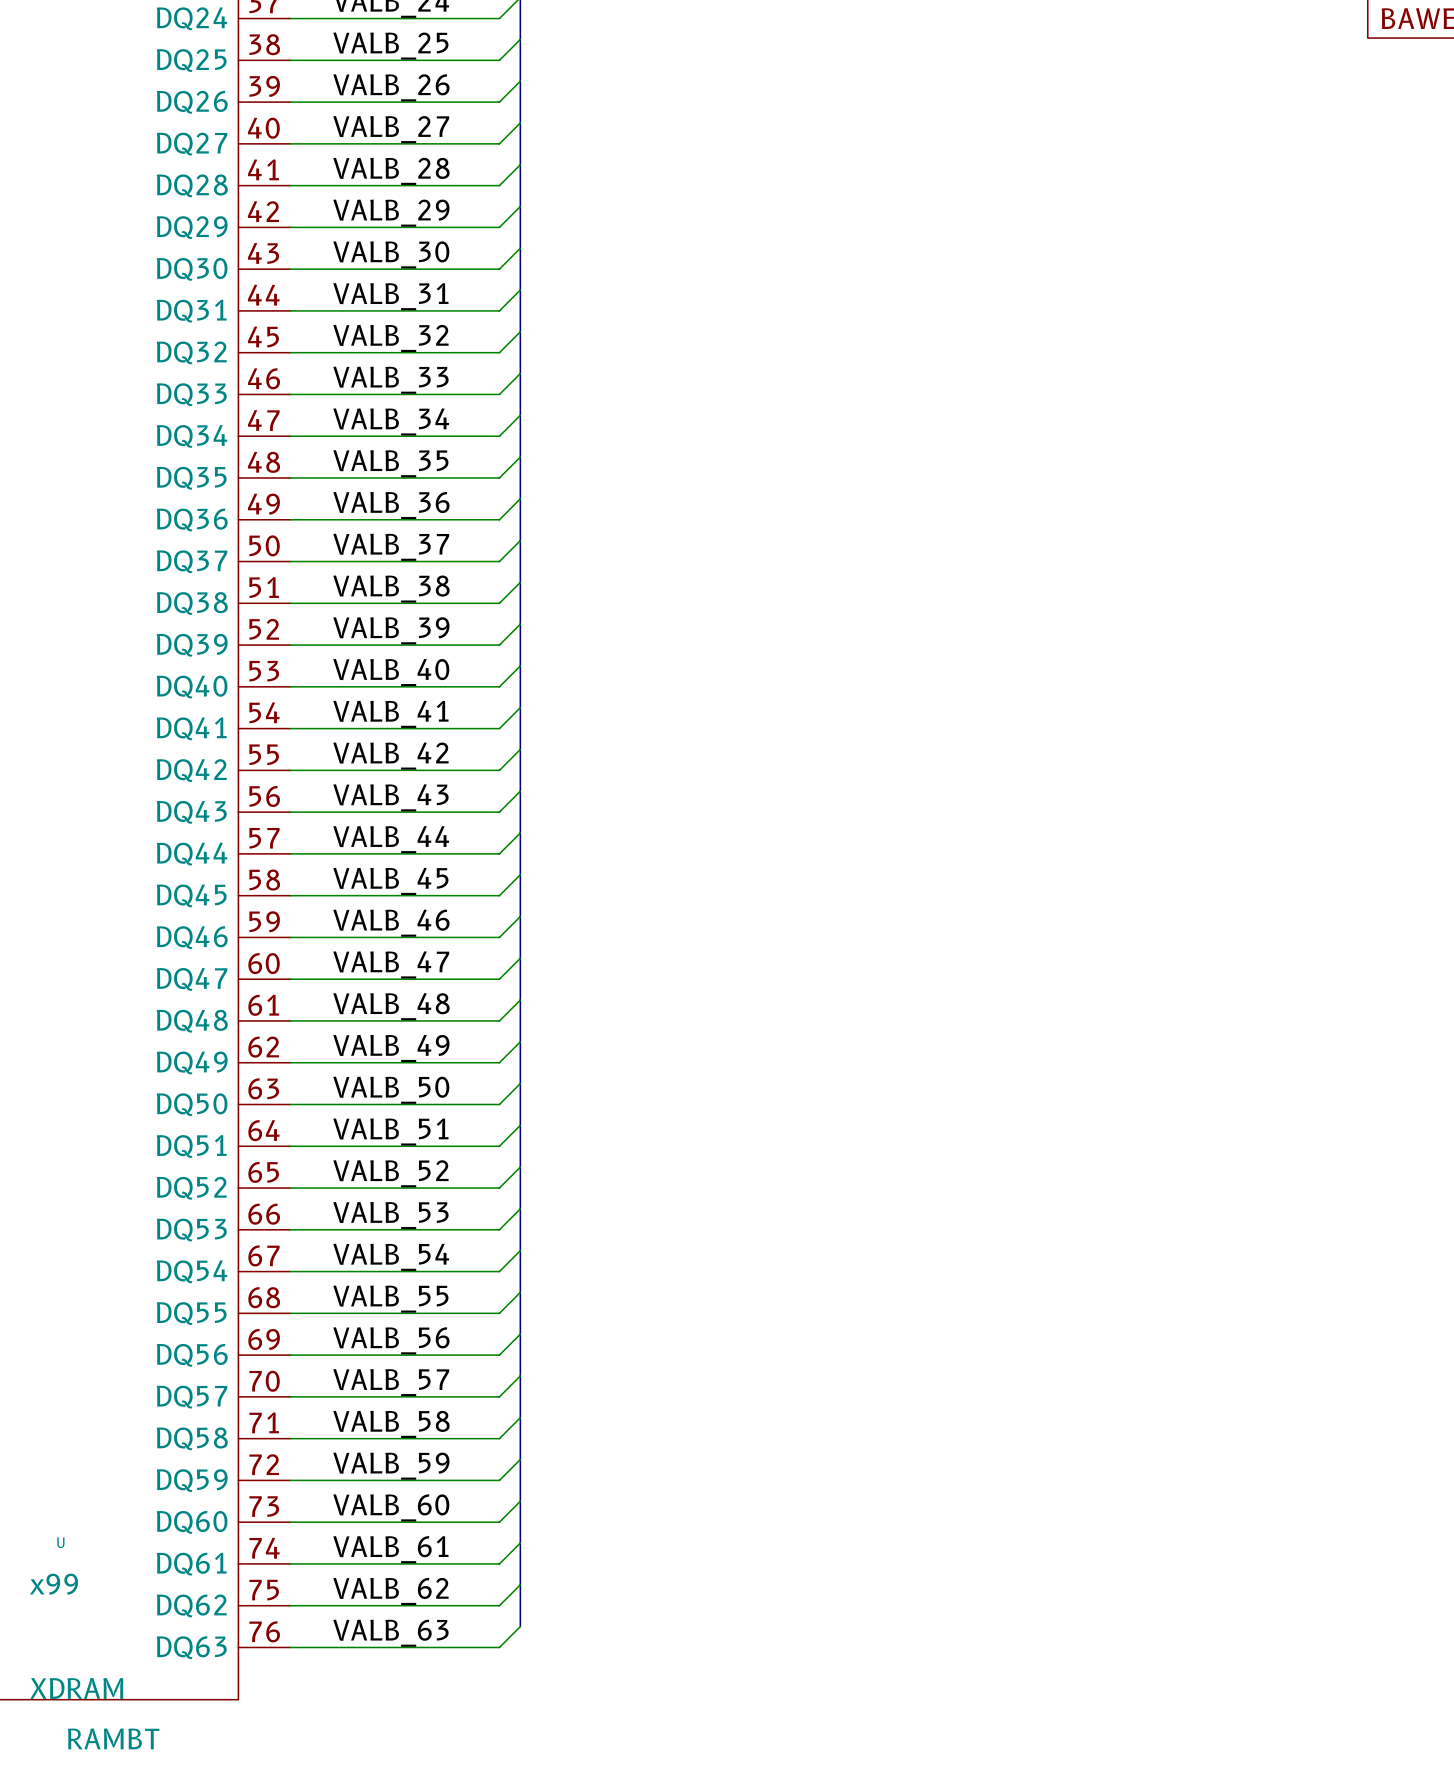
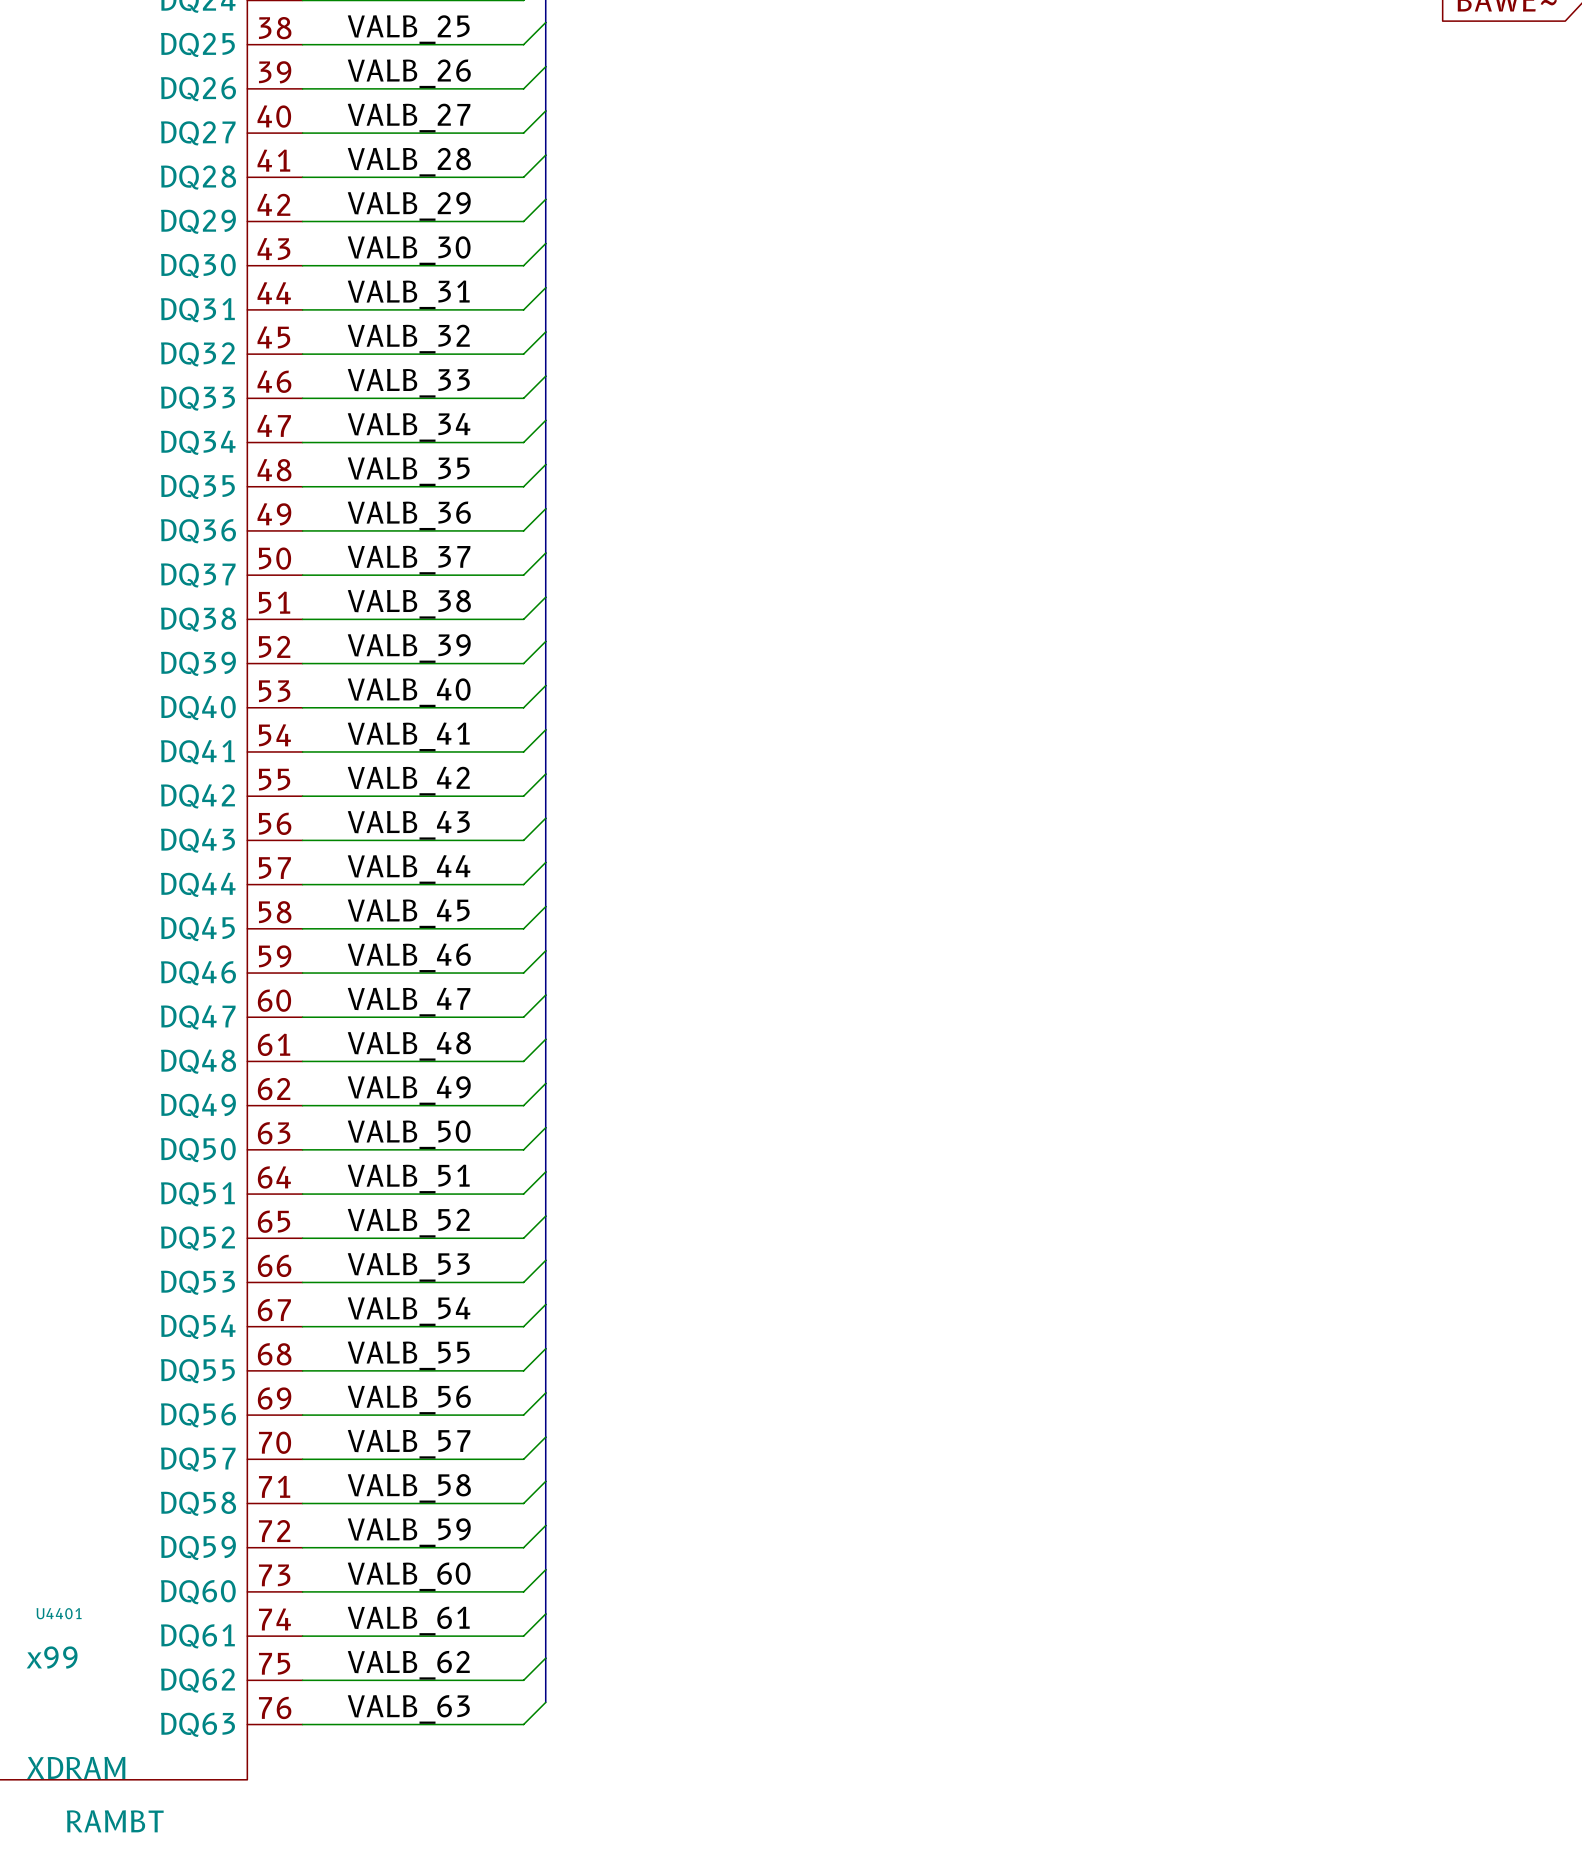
U name: U (60, 1542) -> U4401 (59, 1613)

